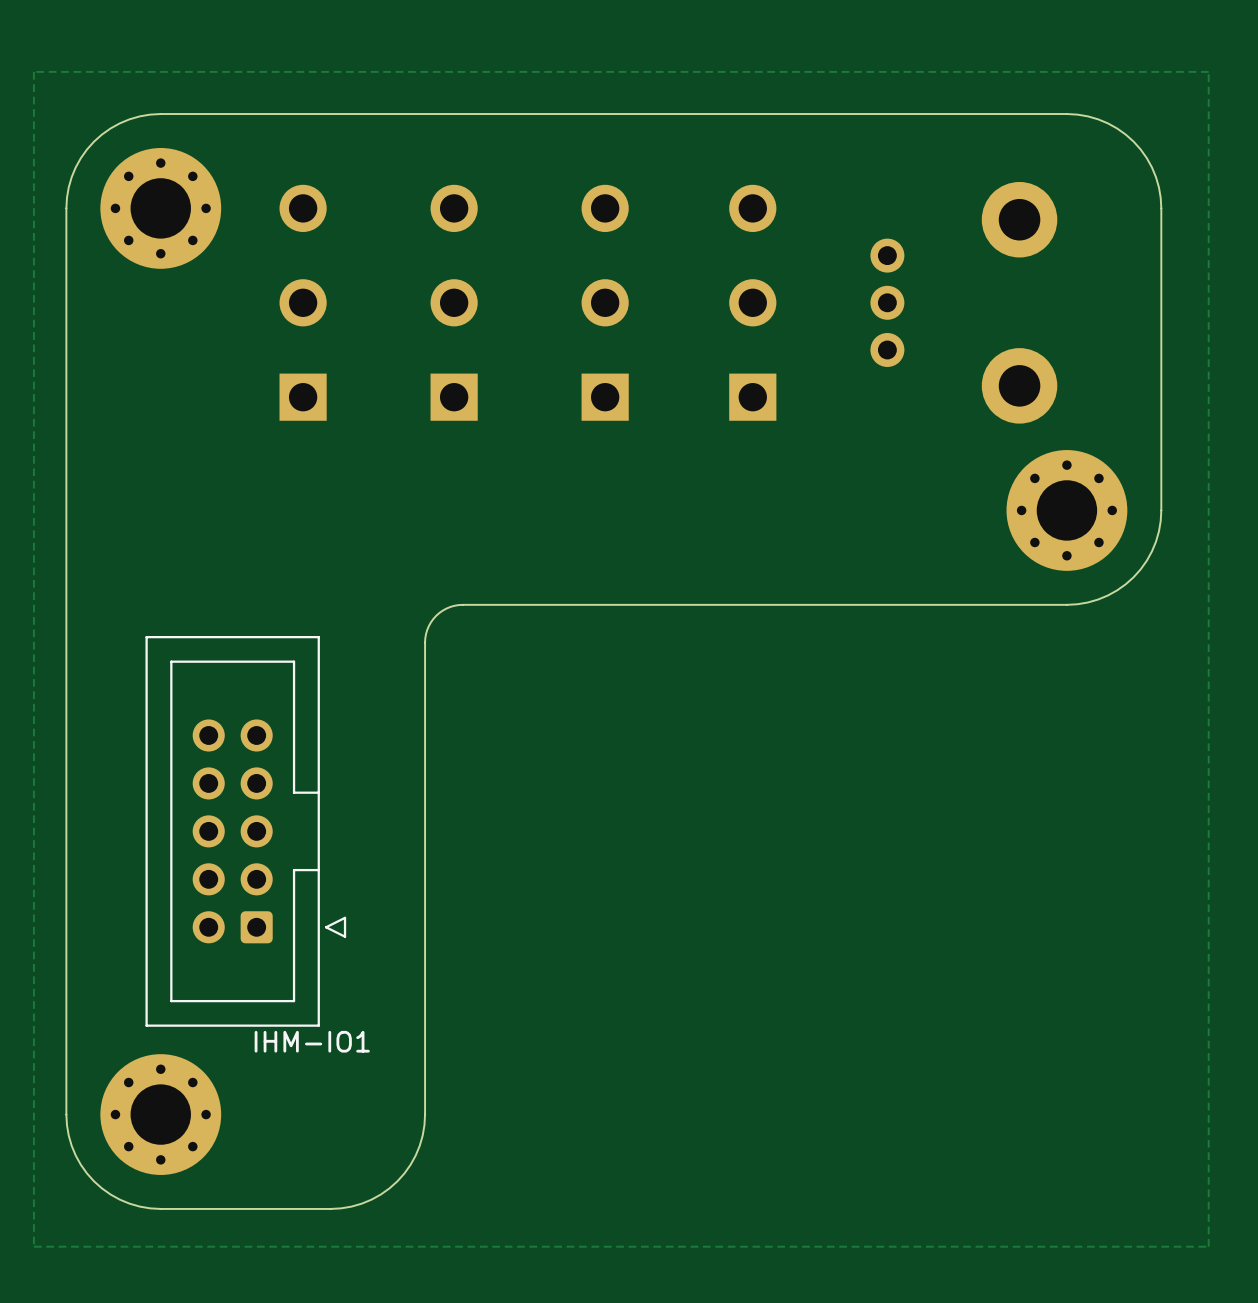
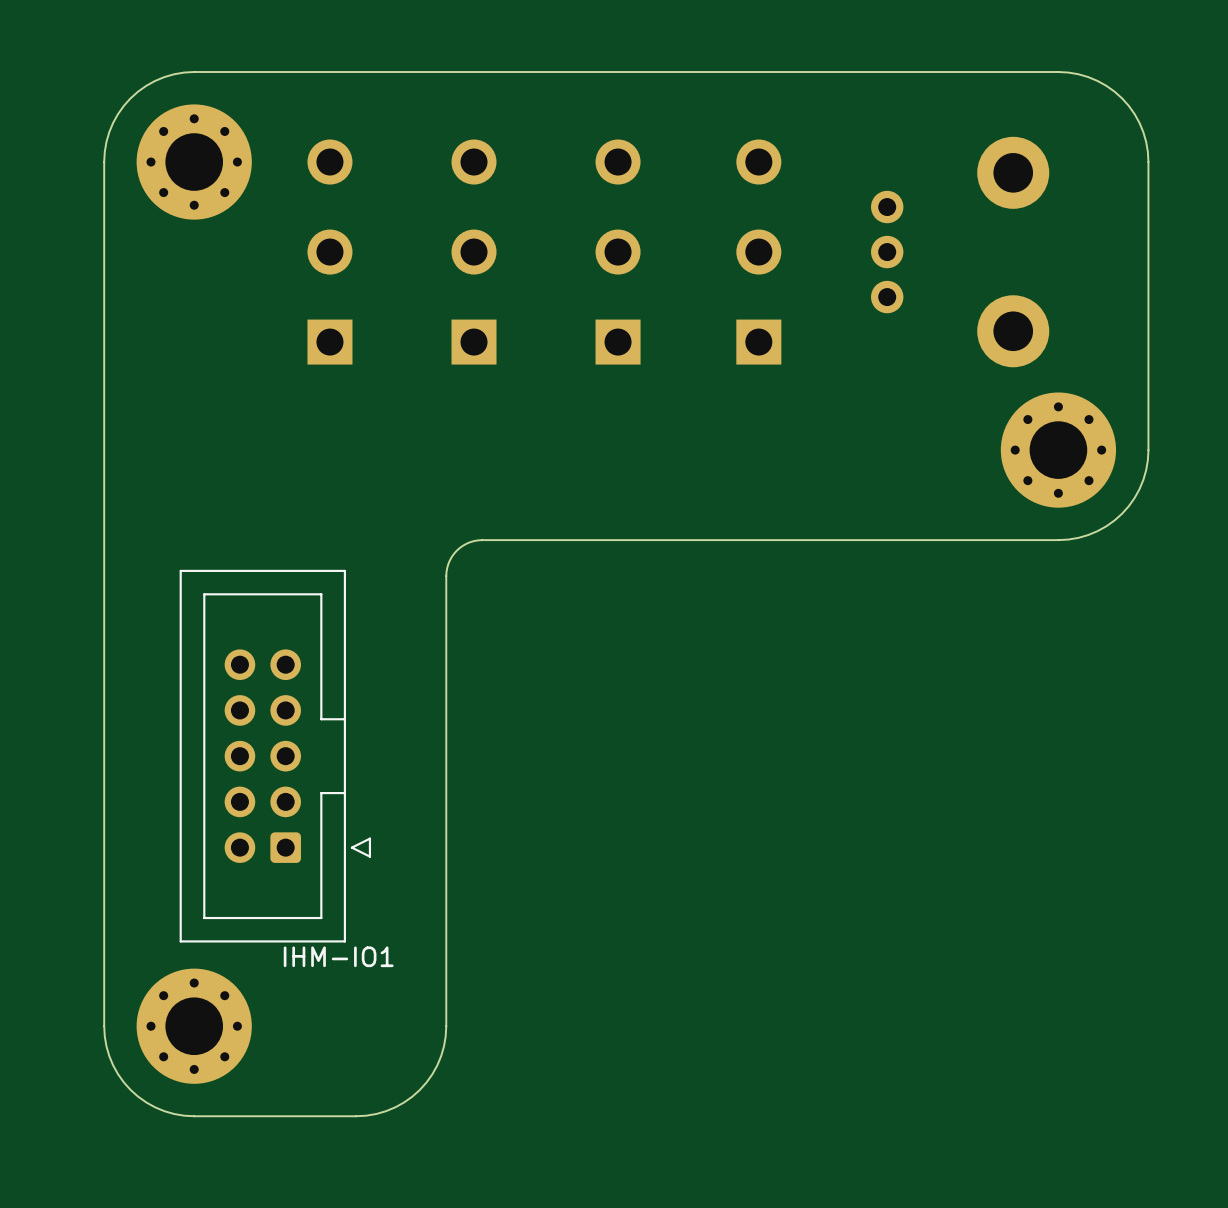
zone outline: (1208, 71) (33, 71) (33, 1246) (1208, 1246) (1208, 71) -> none

